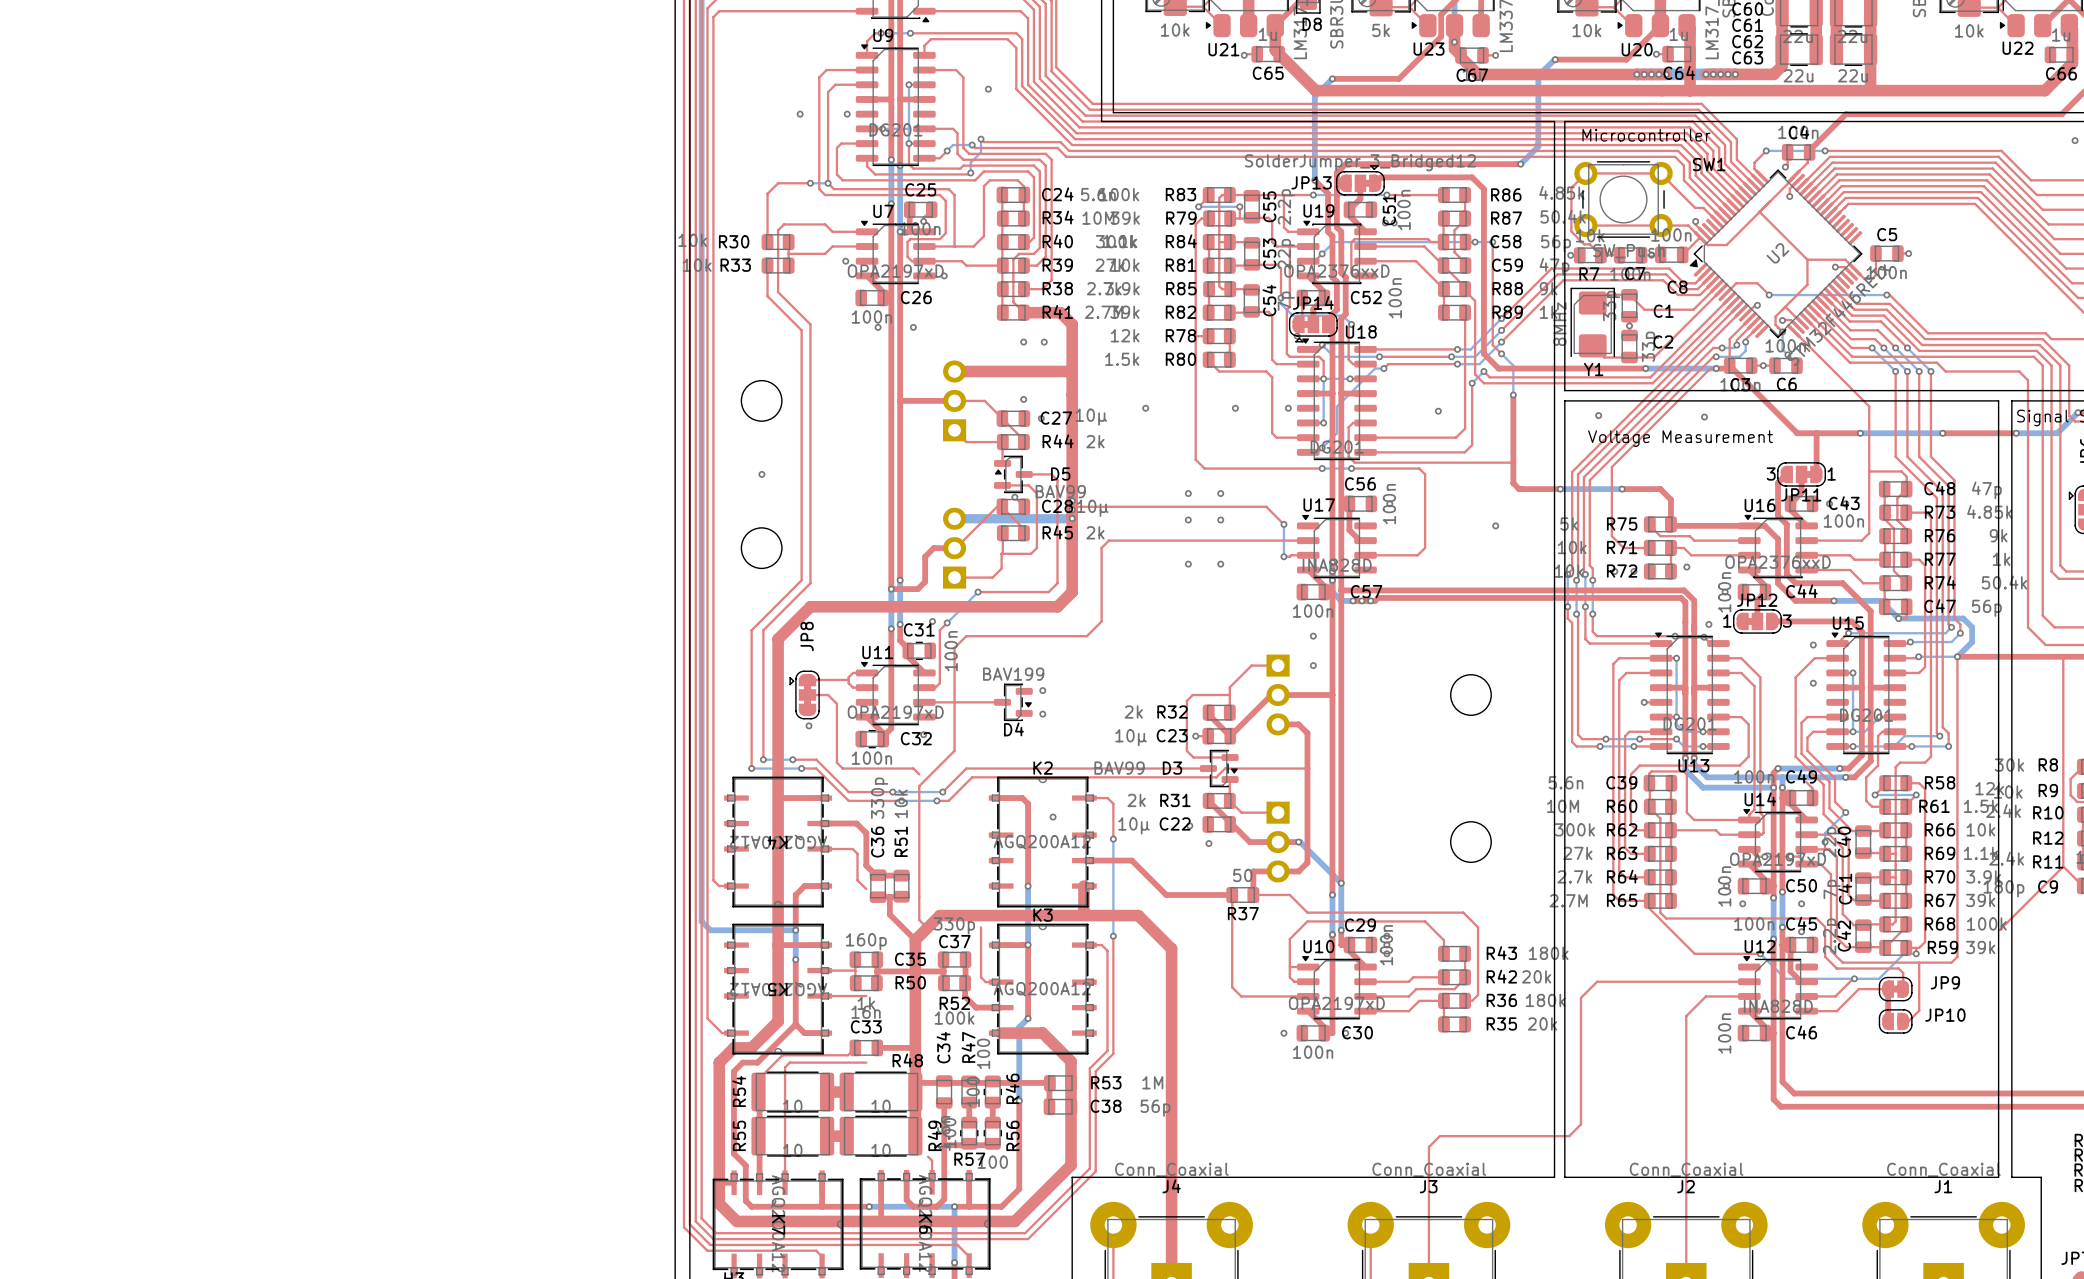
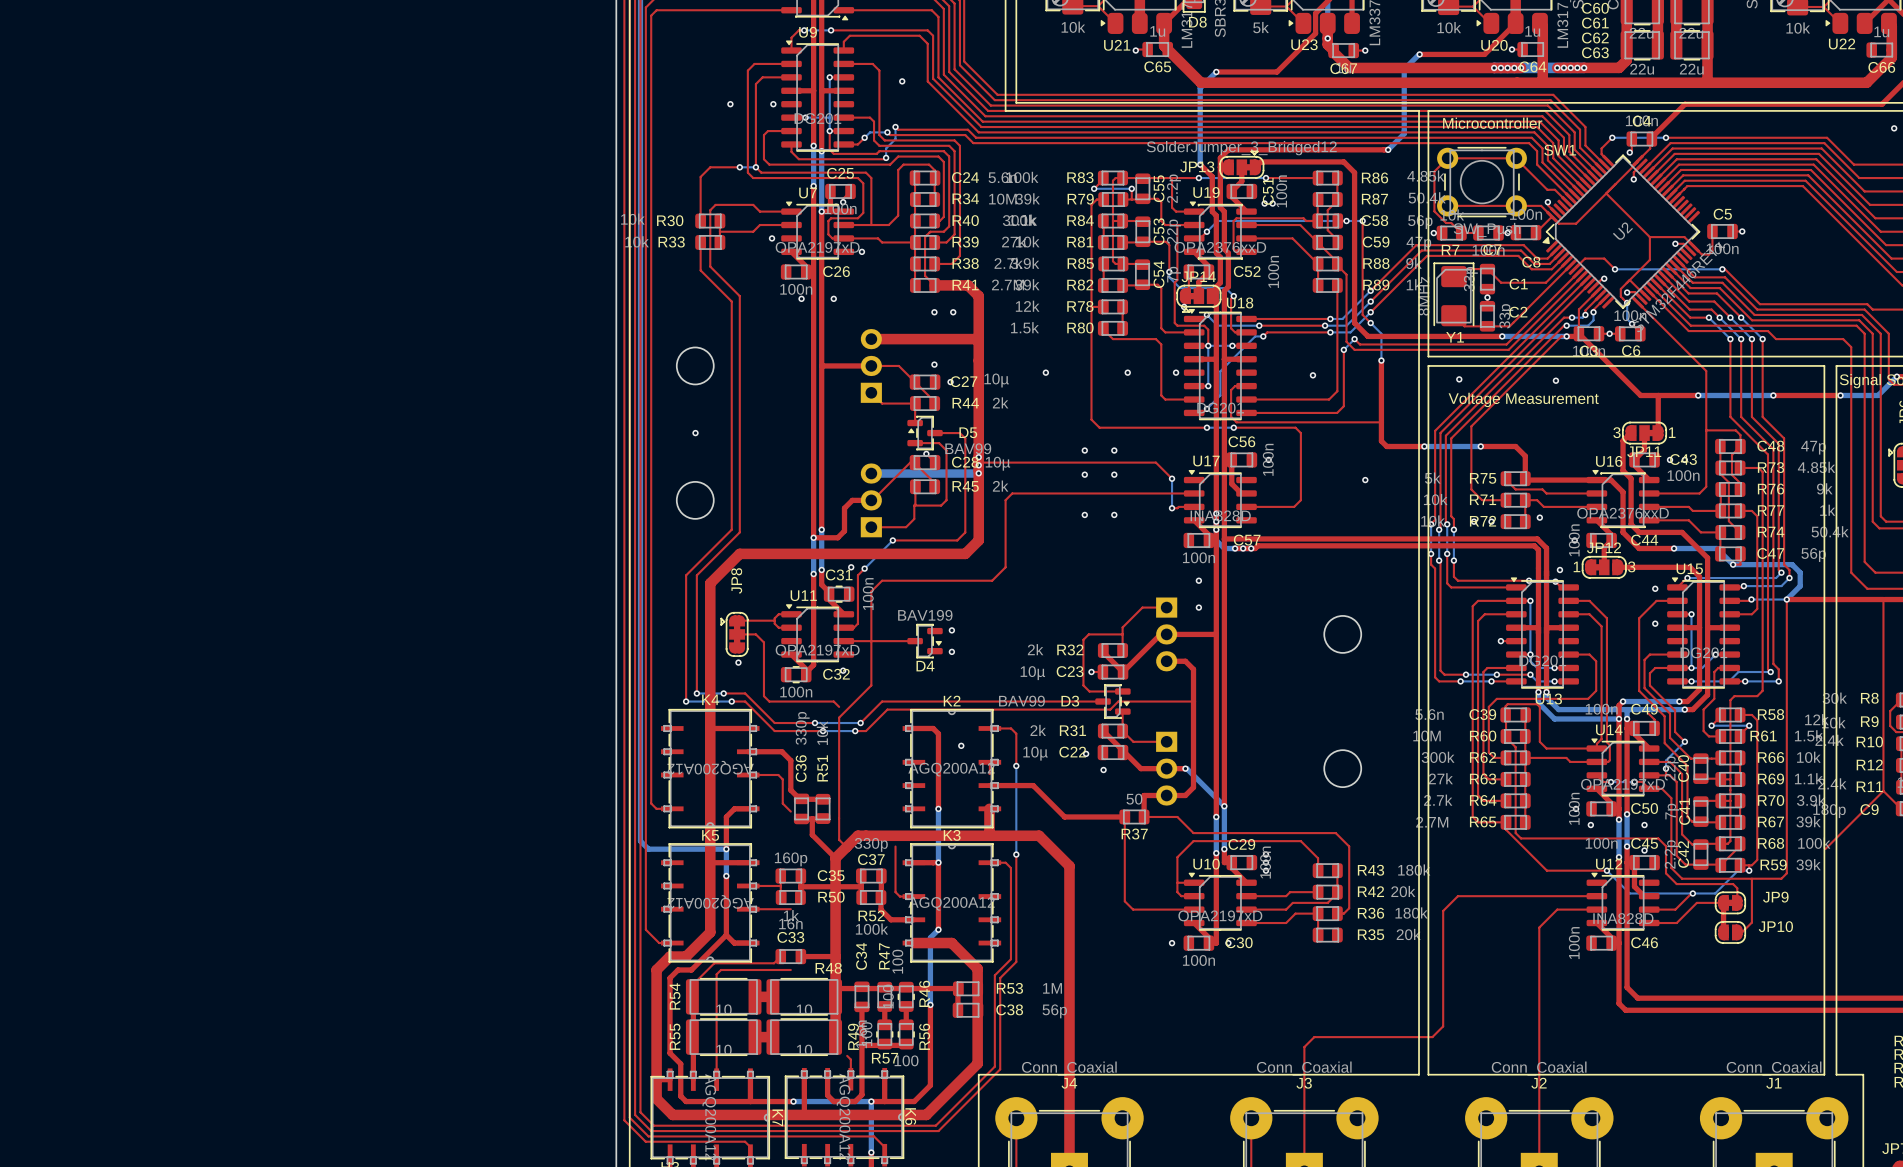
K4 name rotation: 0° (777, 842) -> 180° (710, 699)
K4 name position: K4 (777, 842) -> K4 (710, 699)
K5 name rotation: 0° (777, 989) -> 180° (710, 835)
K5 name position: K5 (777, 989) -> K5 (710, 835)
K7 name position: K7 (778, 1224) -> K7 (777, 1117)
K6 name position: K6 (925, 1224) -> K6 (910, 1116)

